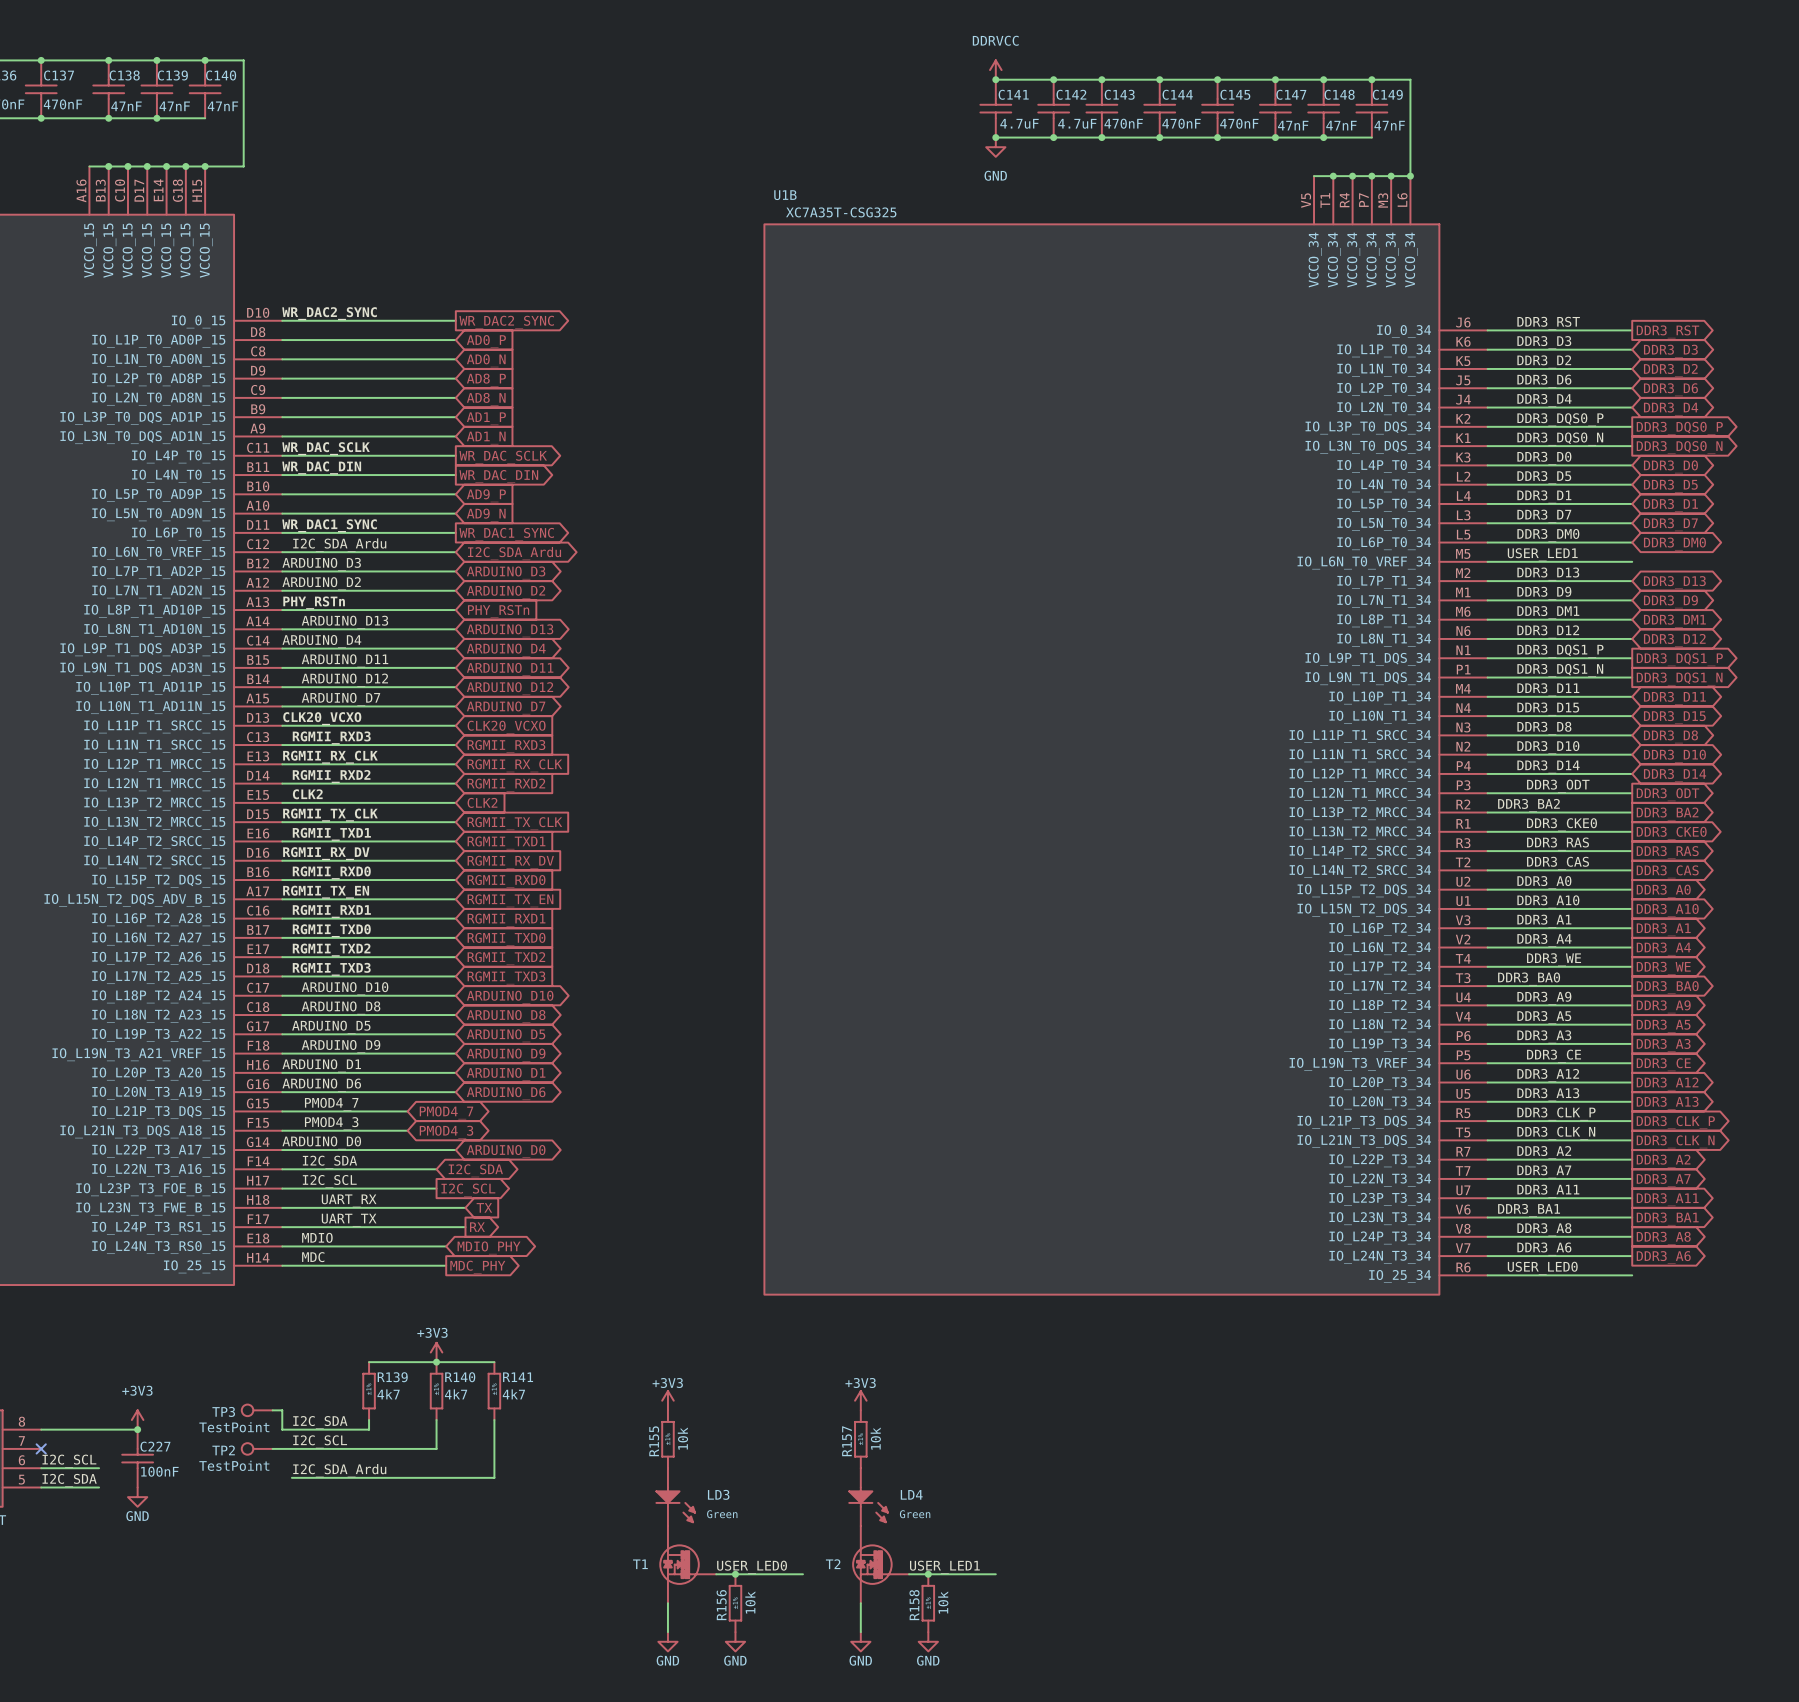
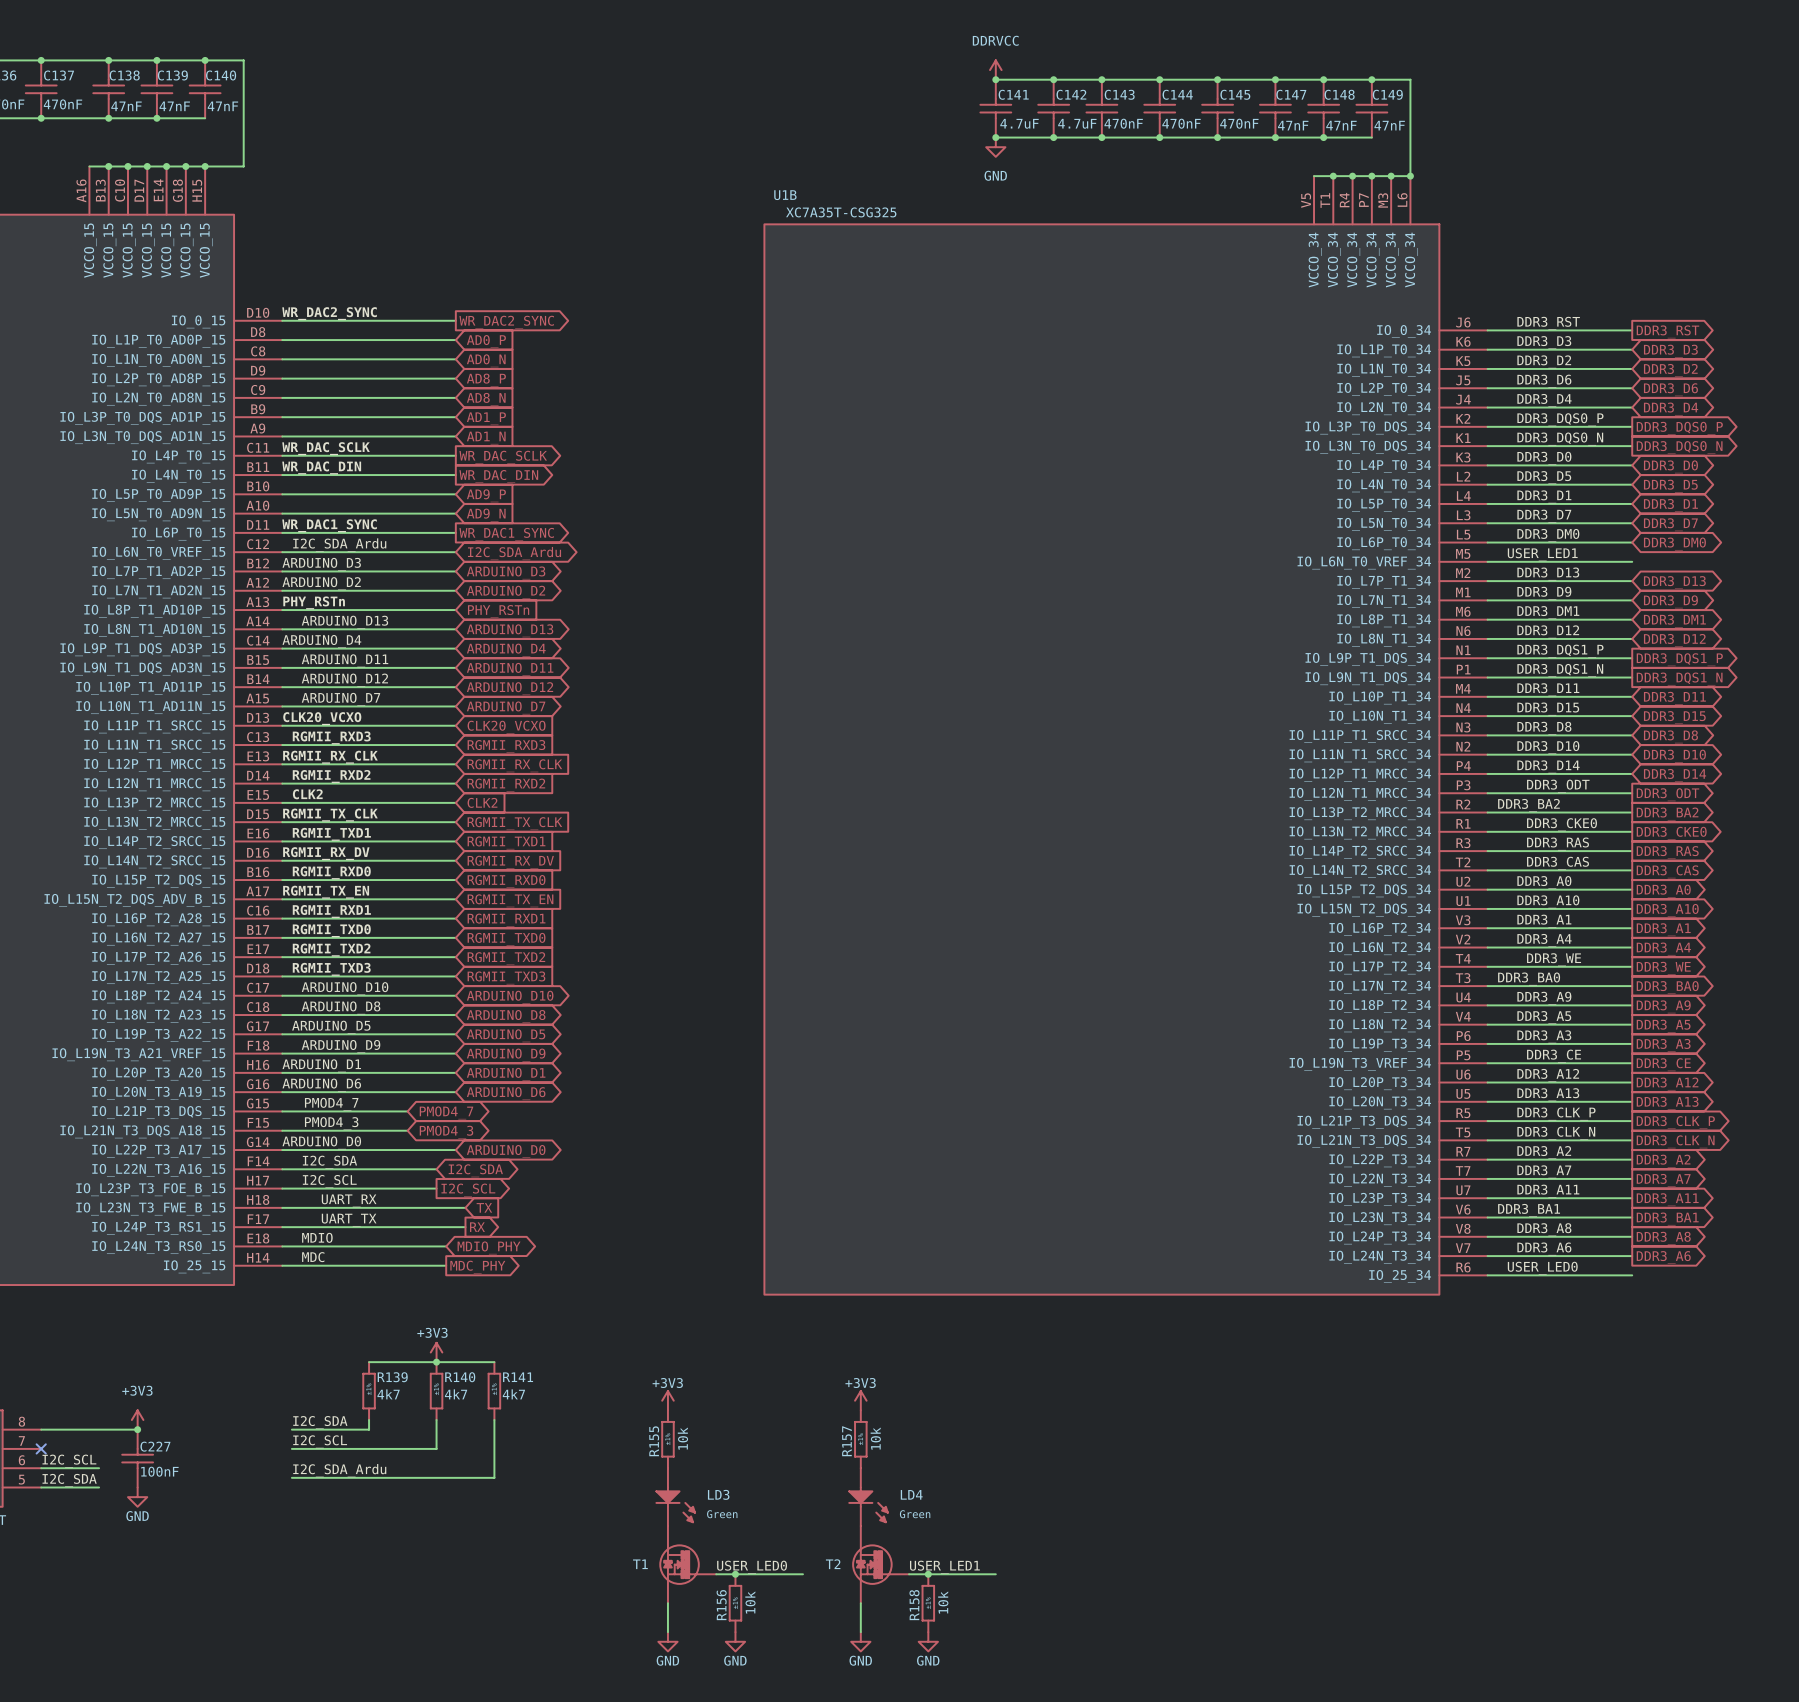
TP3: TestPoint (257, 1410) -> none
wire: (272, 1410) (282, 1410) (282, 1429) (291, 1429) -> none
TP2: TestPoint (257, 1448) -> none
wire: (272, 1448) (291, 1448) -> none

